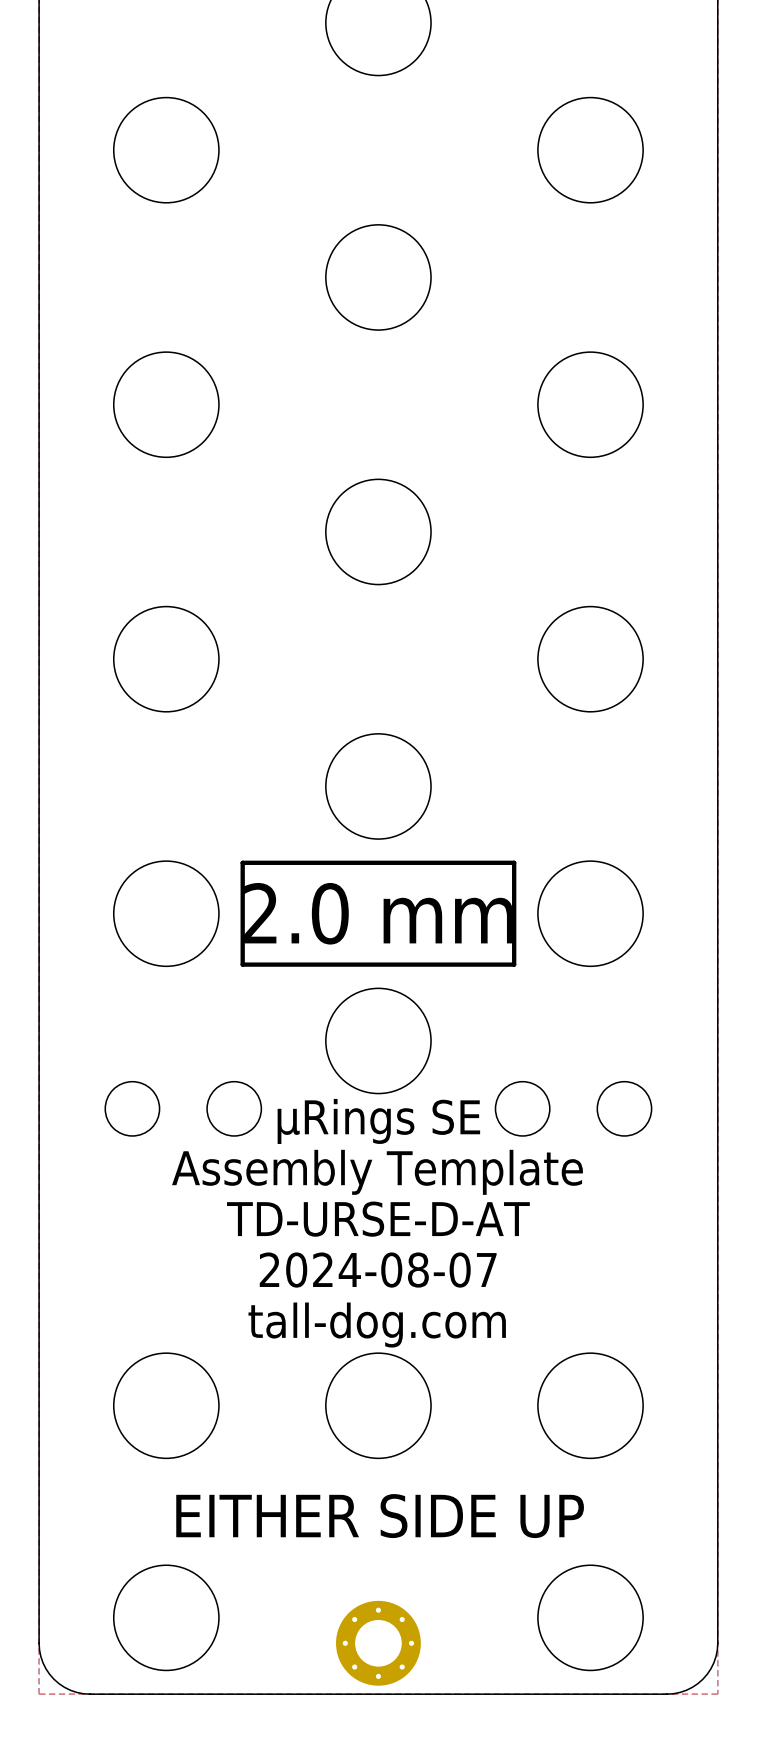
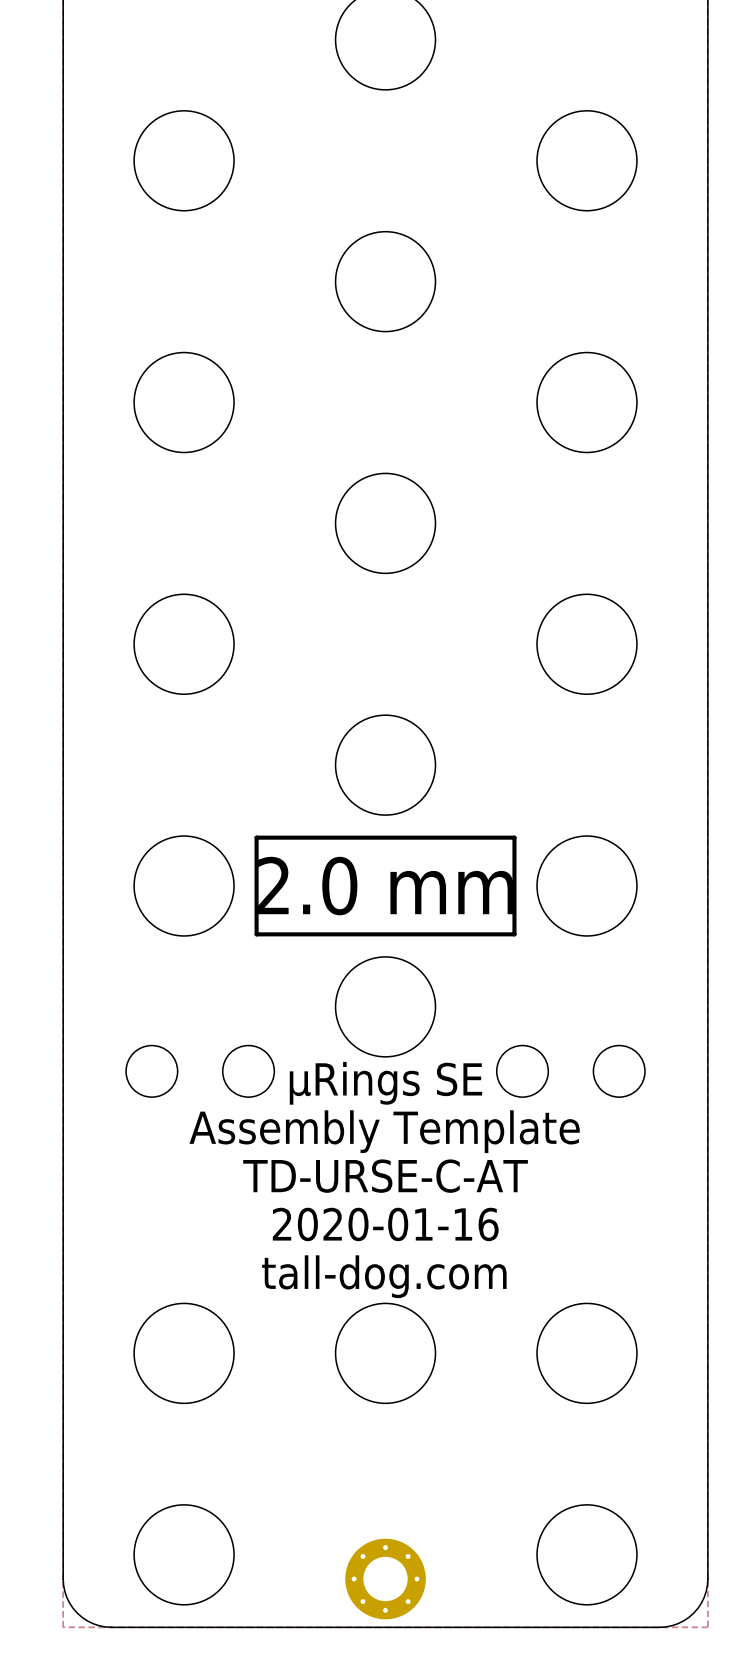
text: TD-URSE-D-AT (378, 1219) -> TD-URSE-C-AT (385, 1176)
text: 2024-08-07 (378, 1270) -> 2020-01-16 (385, 1224)
text: EITHER SIDE UP (380, 1516) -> none

